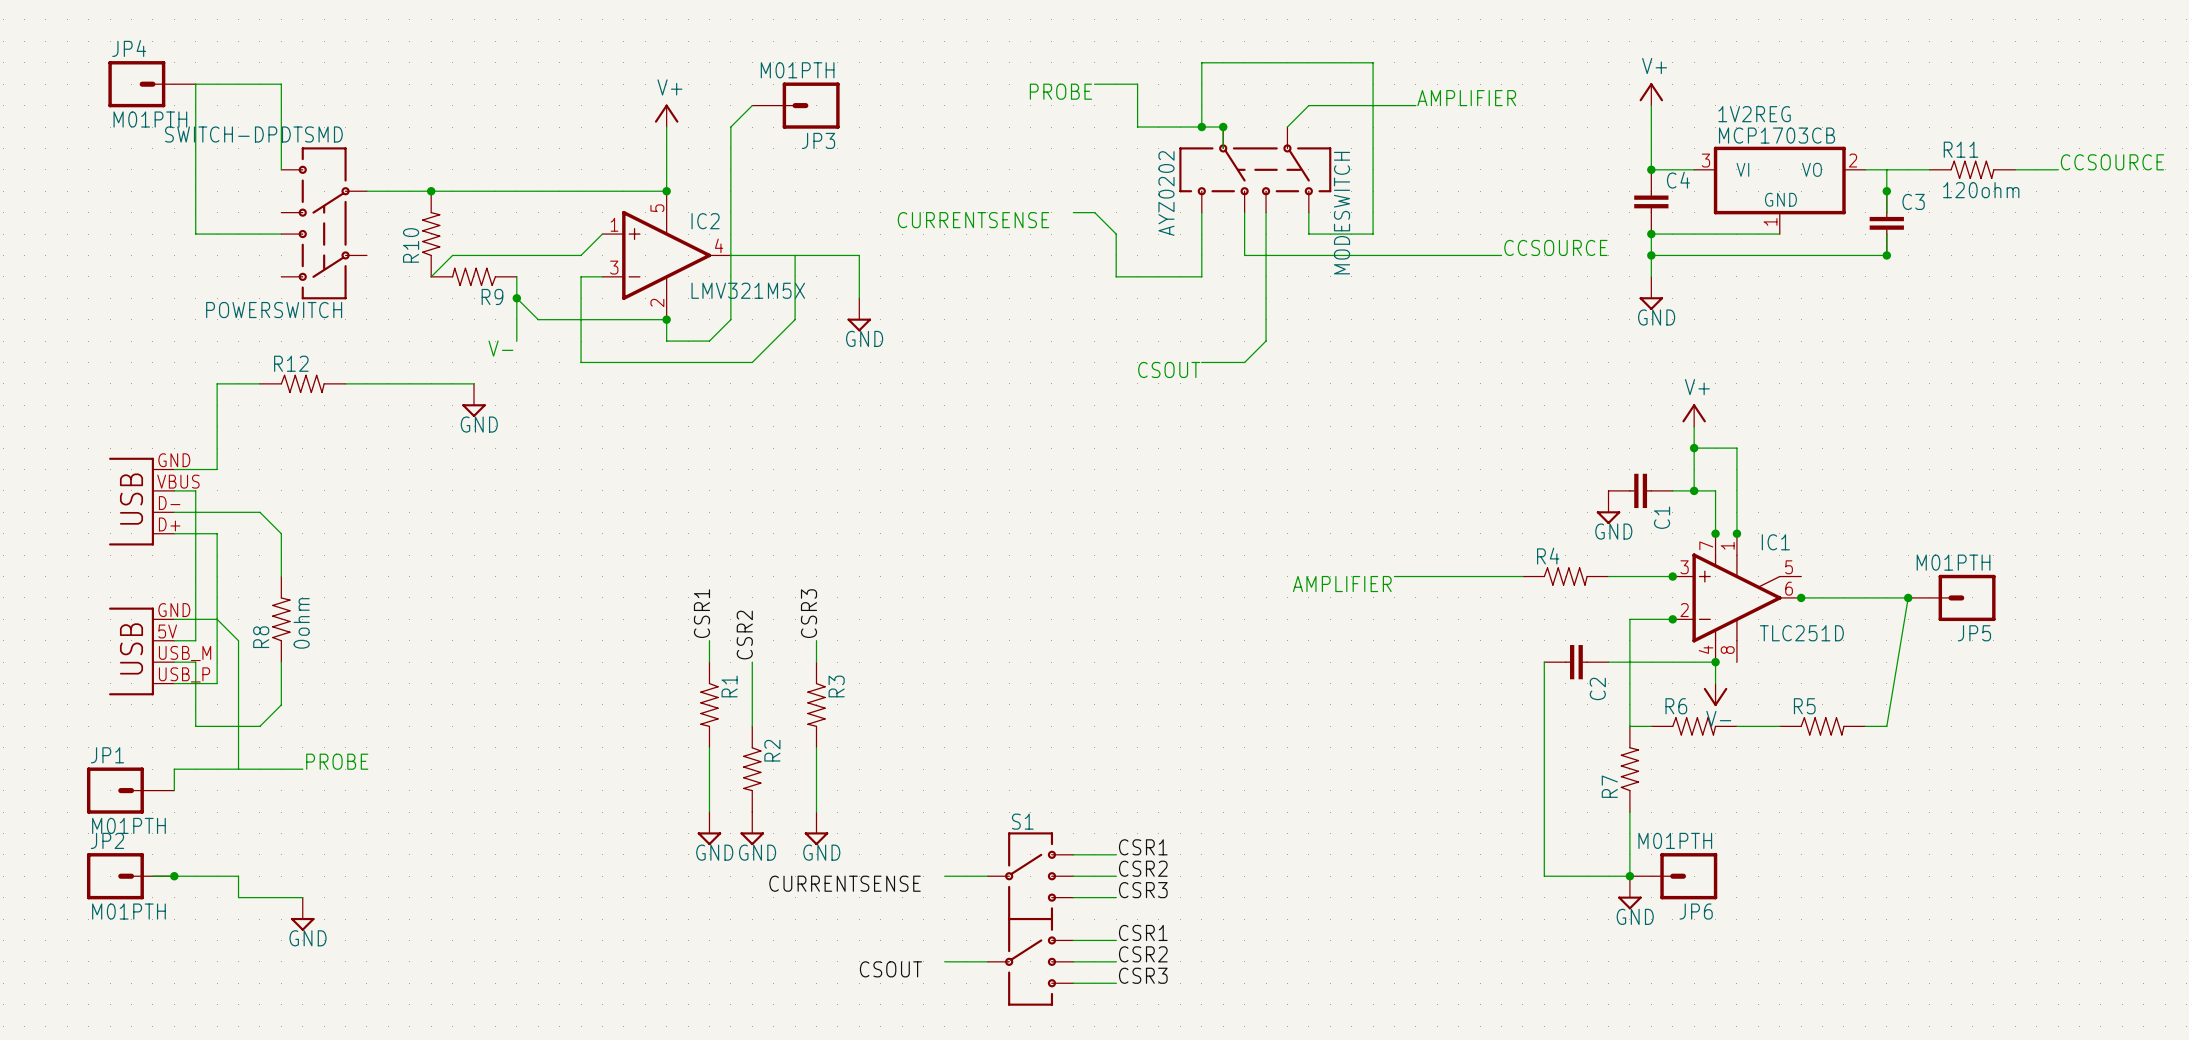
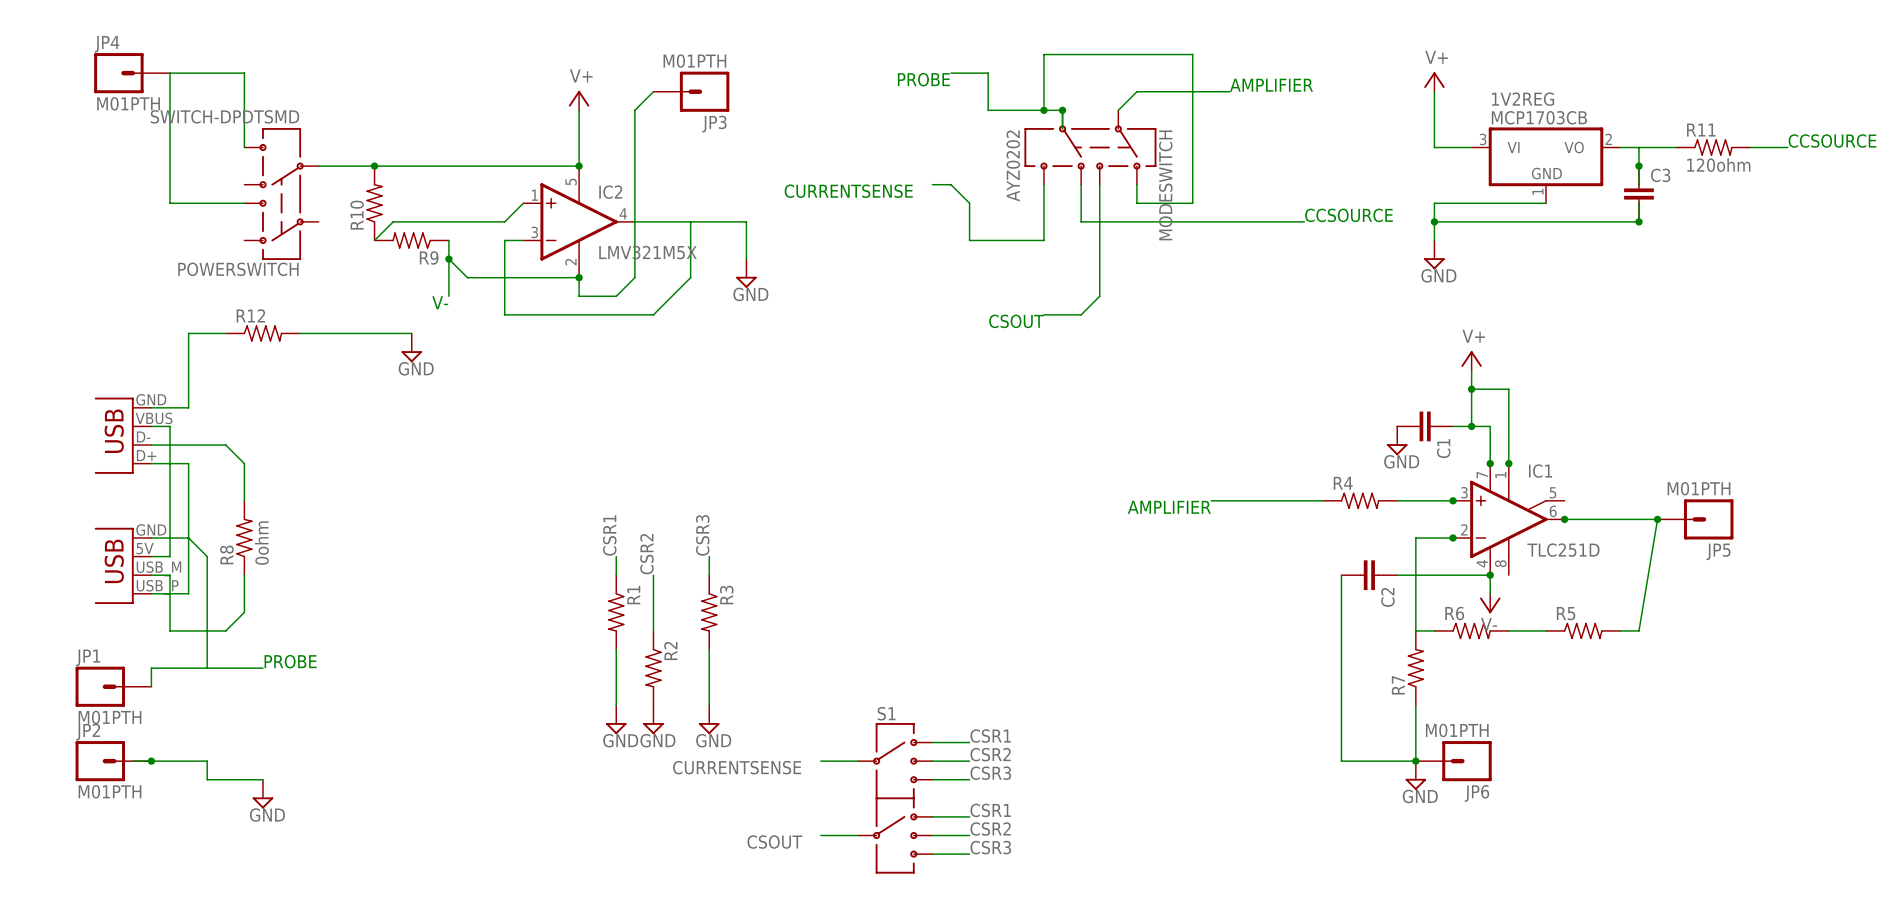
junction: (1651, 169) -> none
C4: (1651, 201) -> none
junction: (1651, 234) -> none

